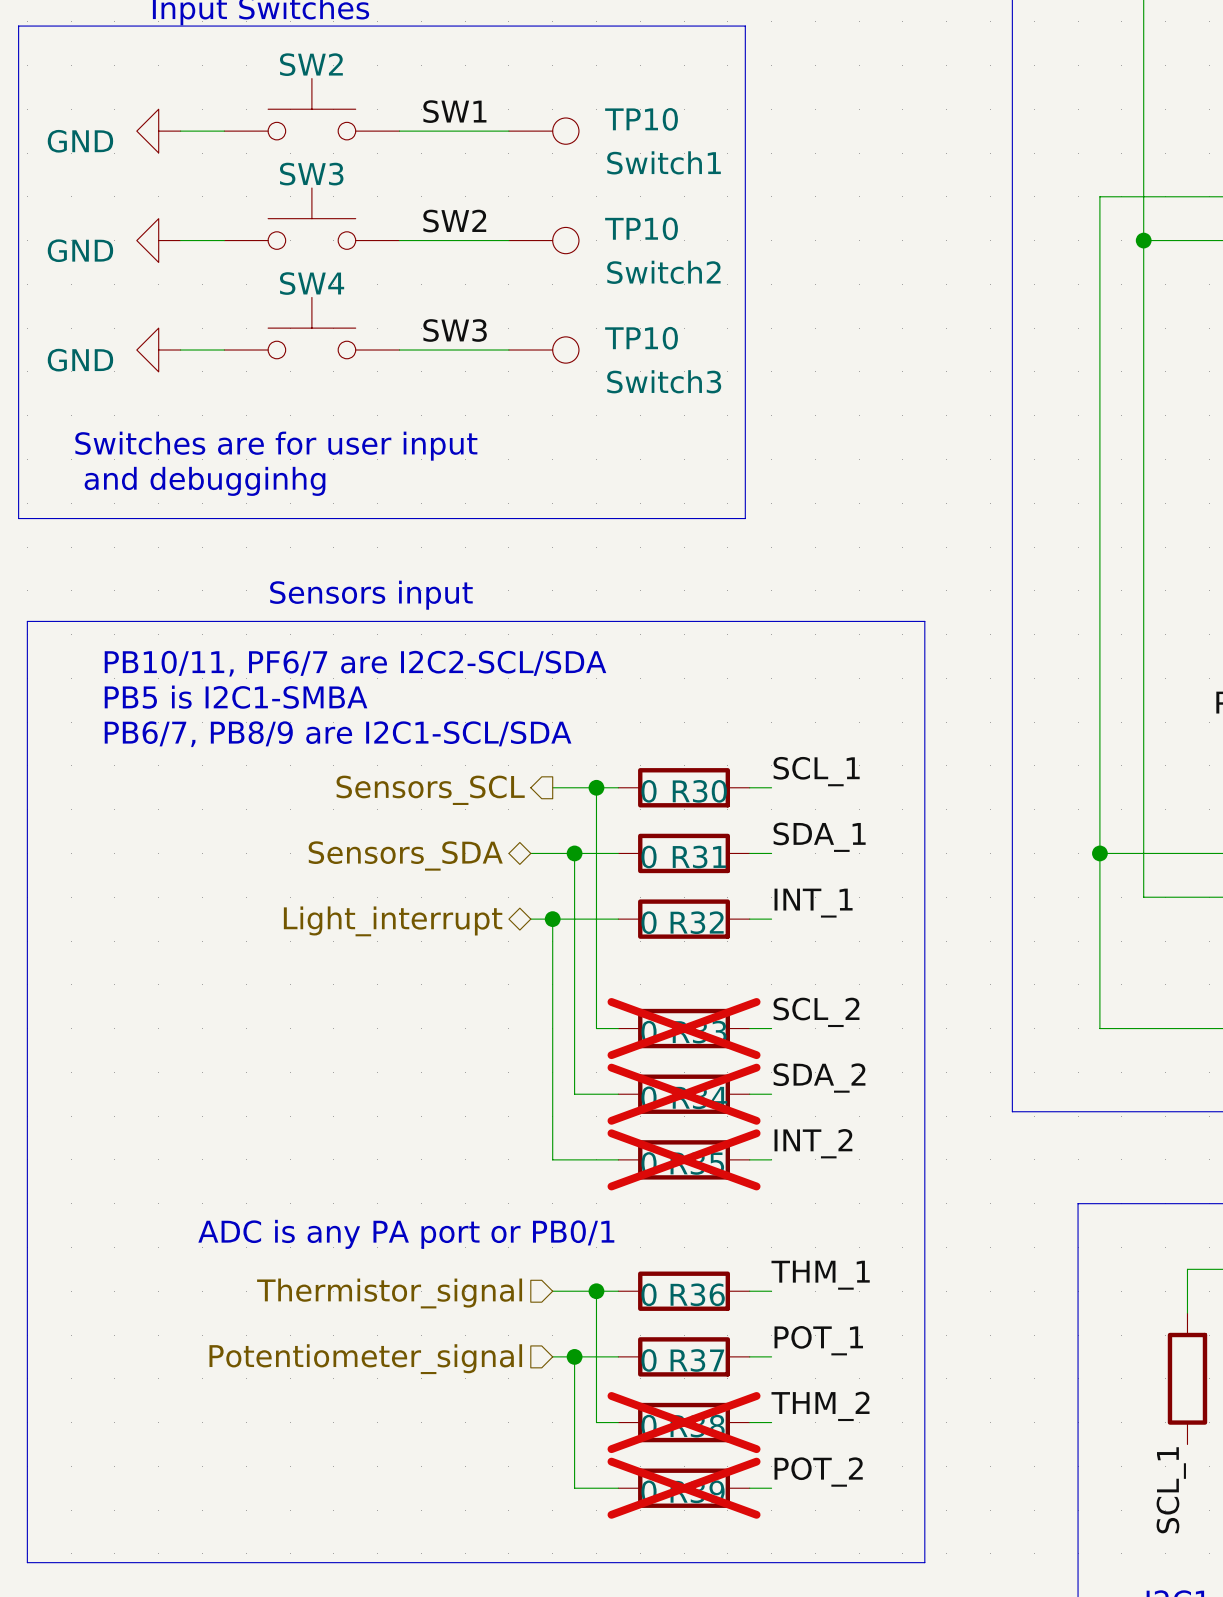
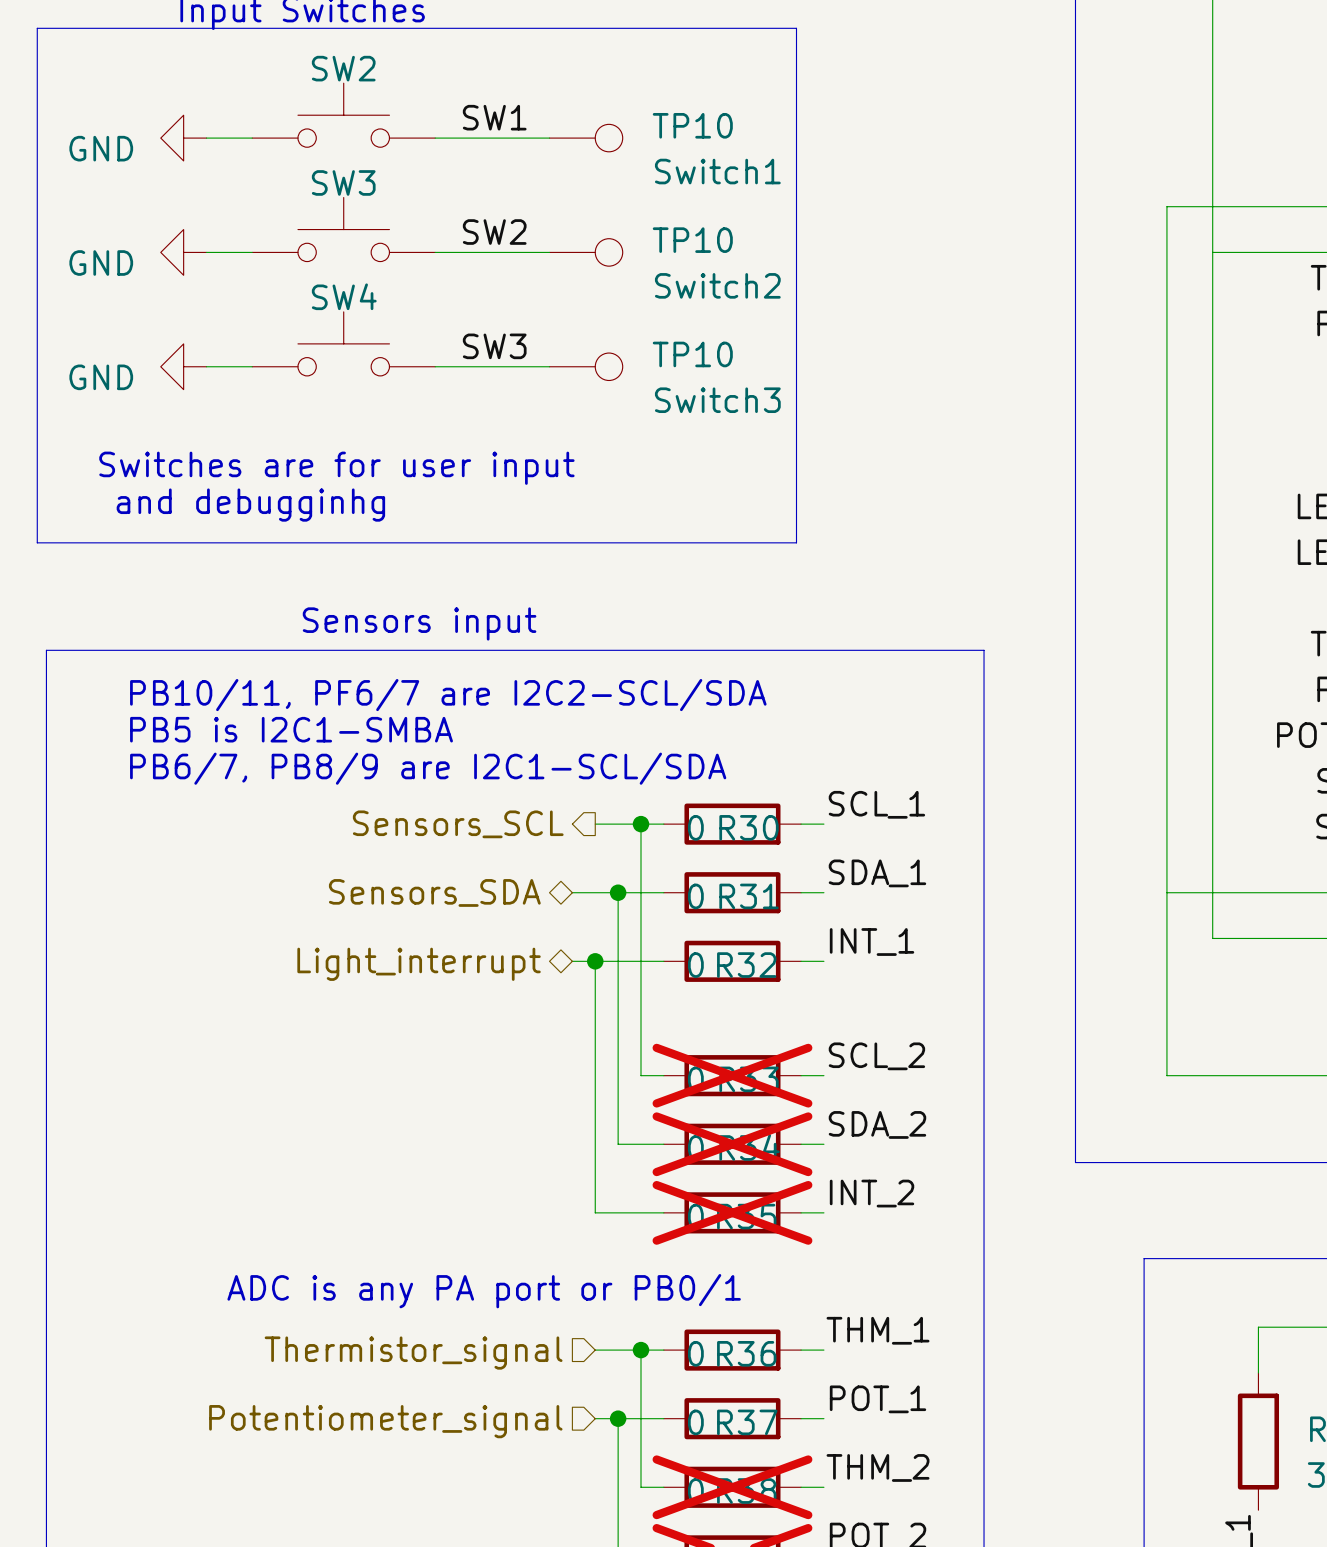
junction: (1143, 240) -> none
junction: (1099, 853) -> none

